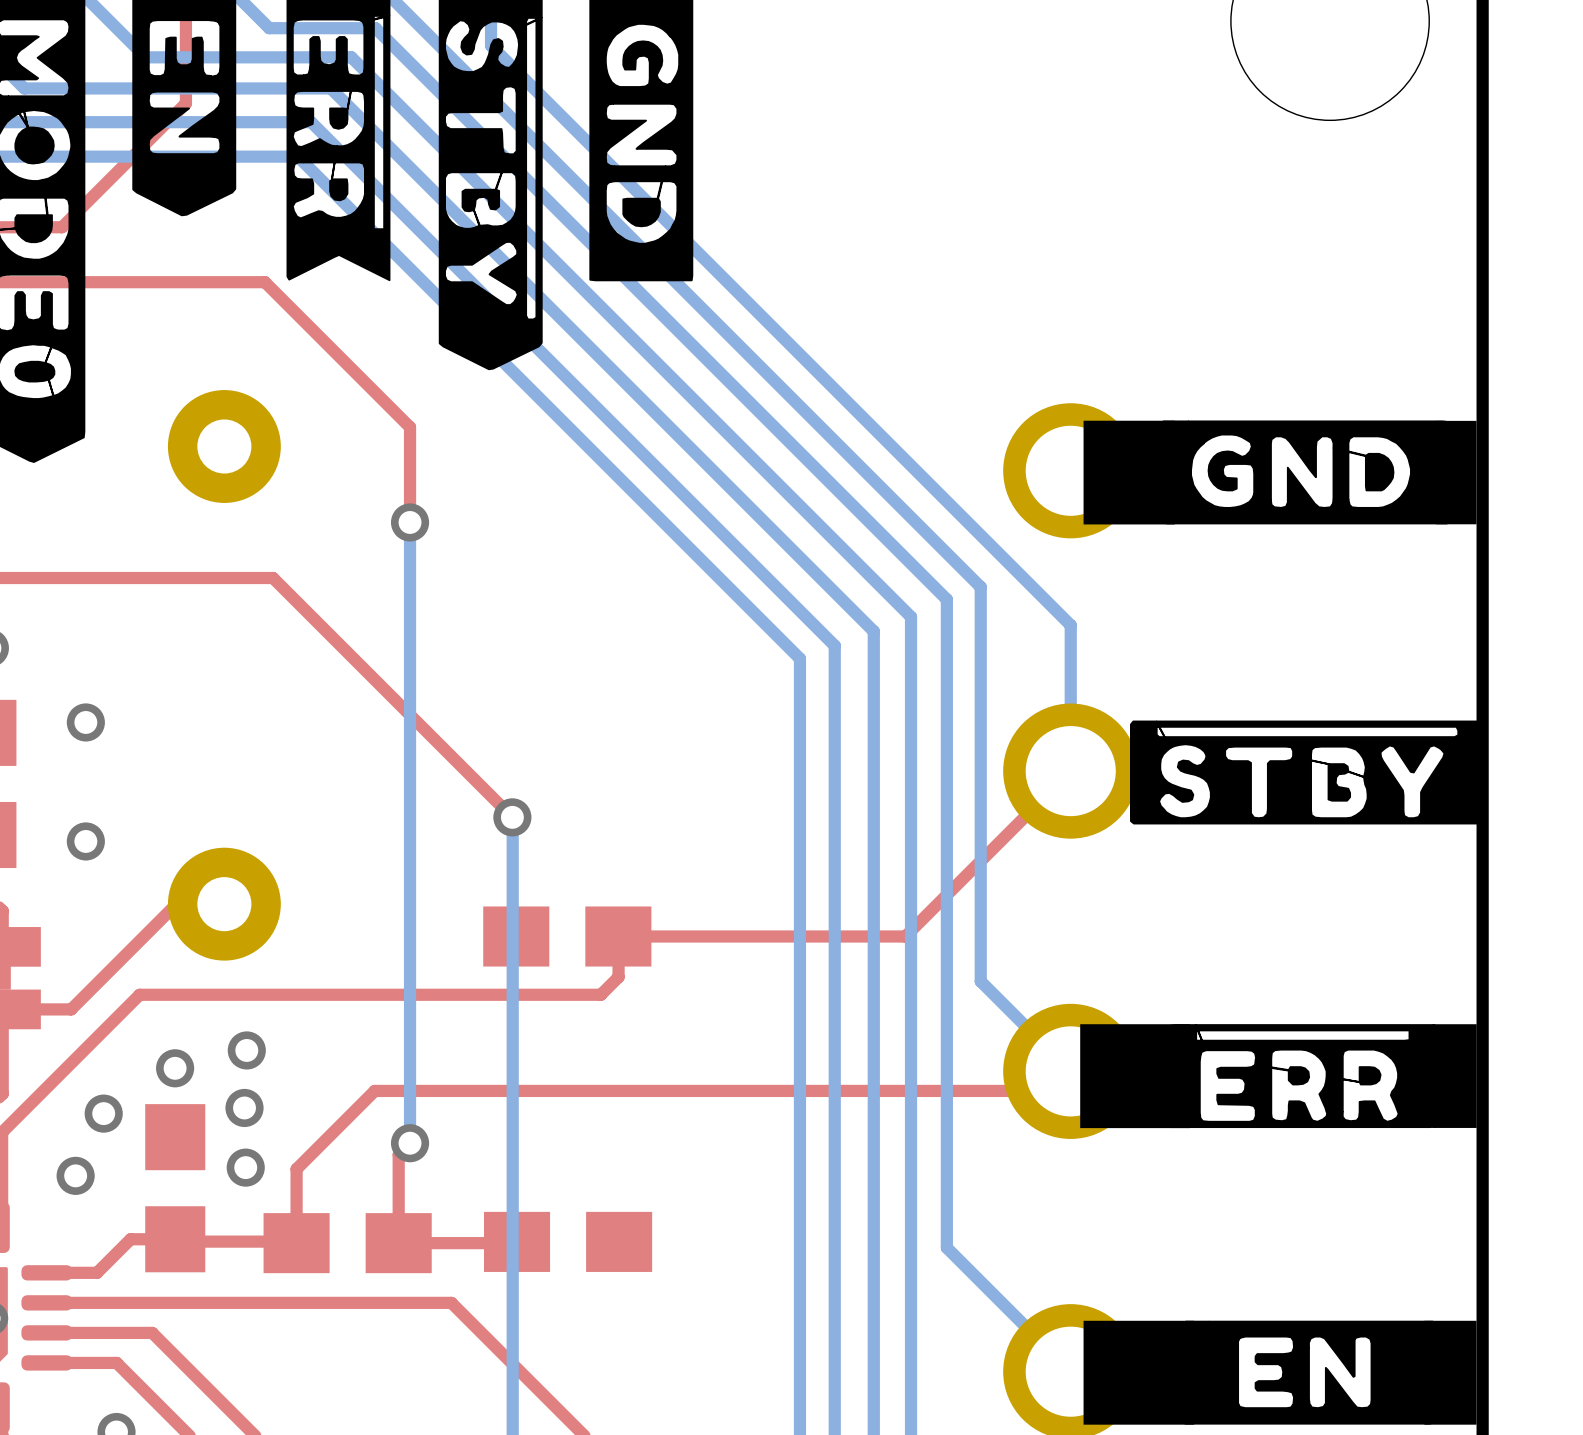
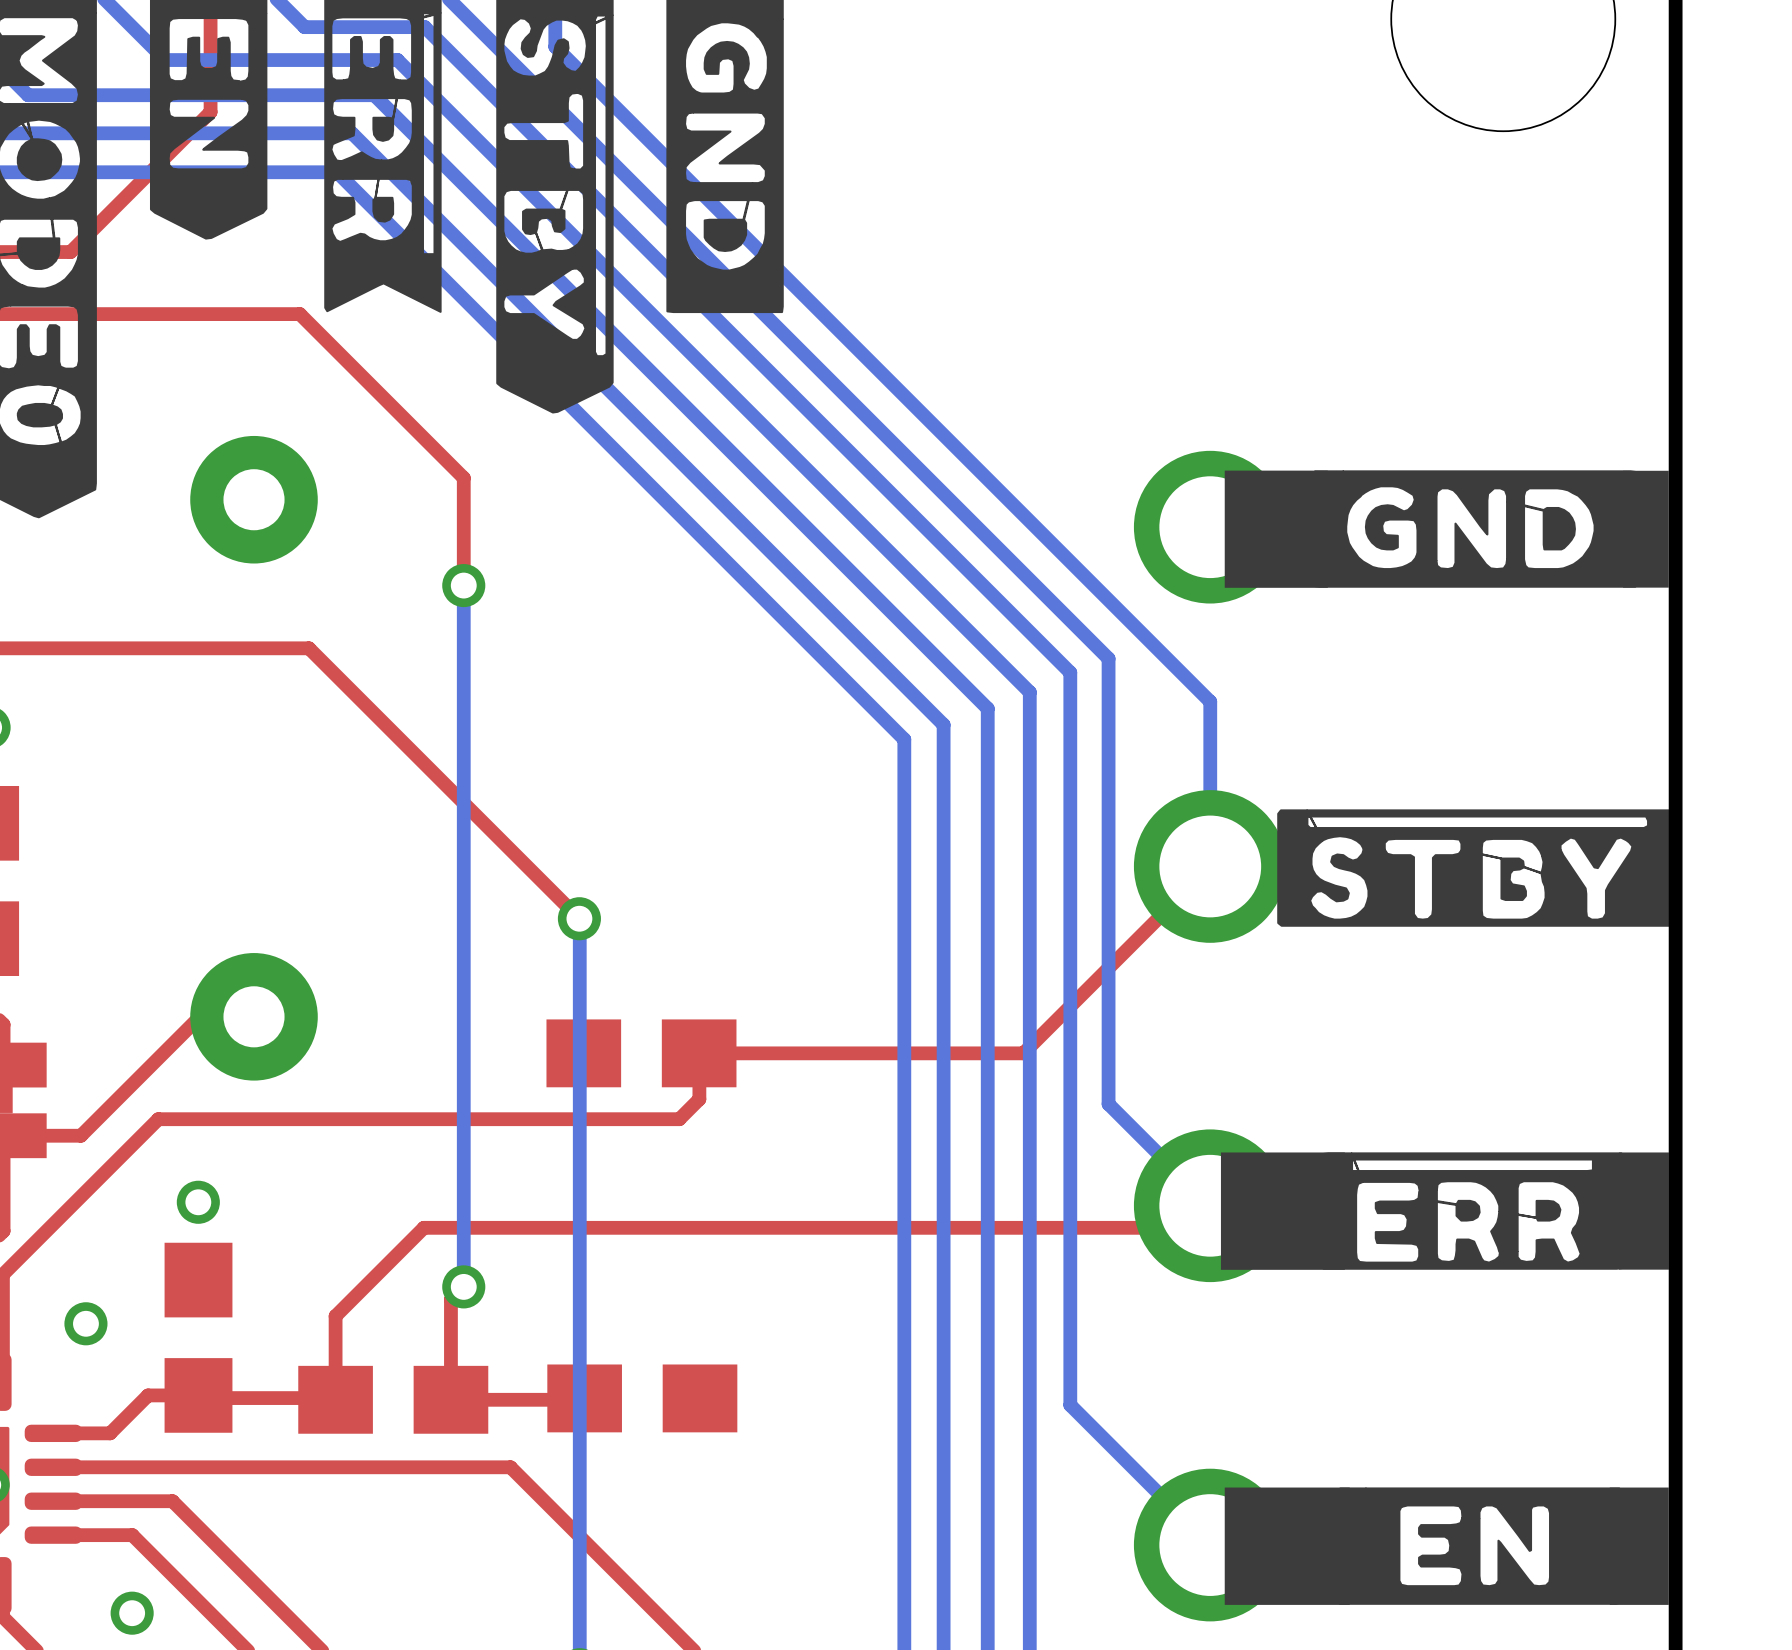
via: (85, 722) -> none
via: (85, 841) -> none
via: (246, 1050) -> none
via: (244, 1107) -> none
via: (103, 1113) -> none
via: (245, 1167) -> none

